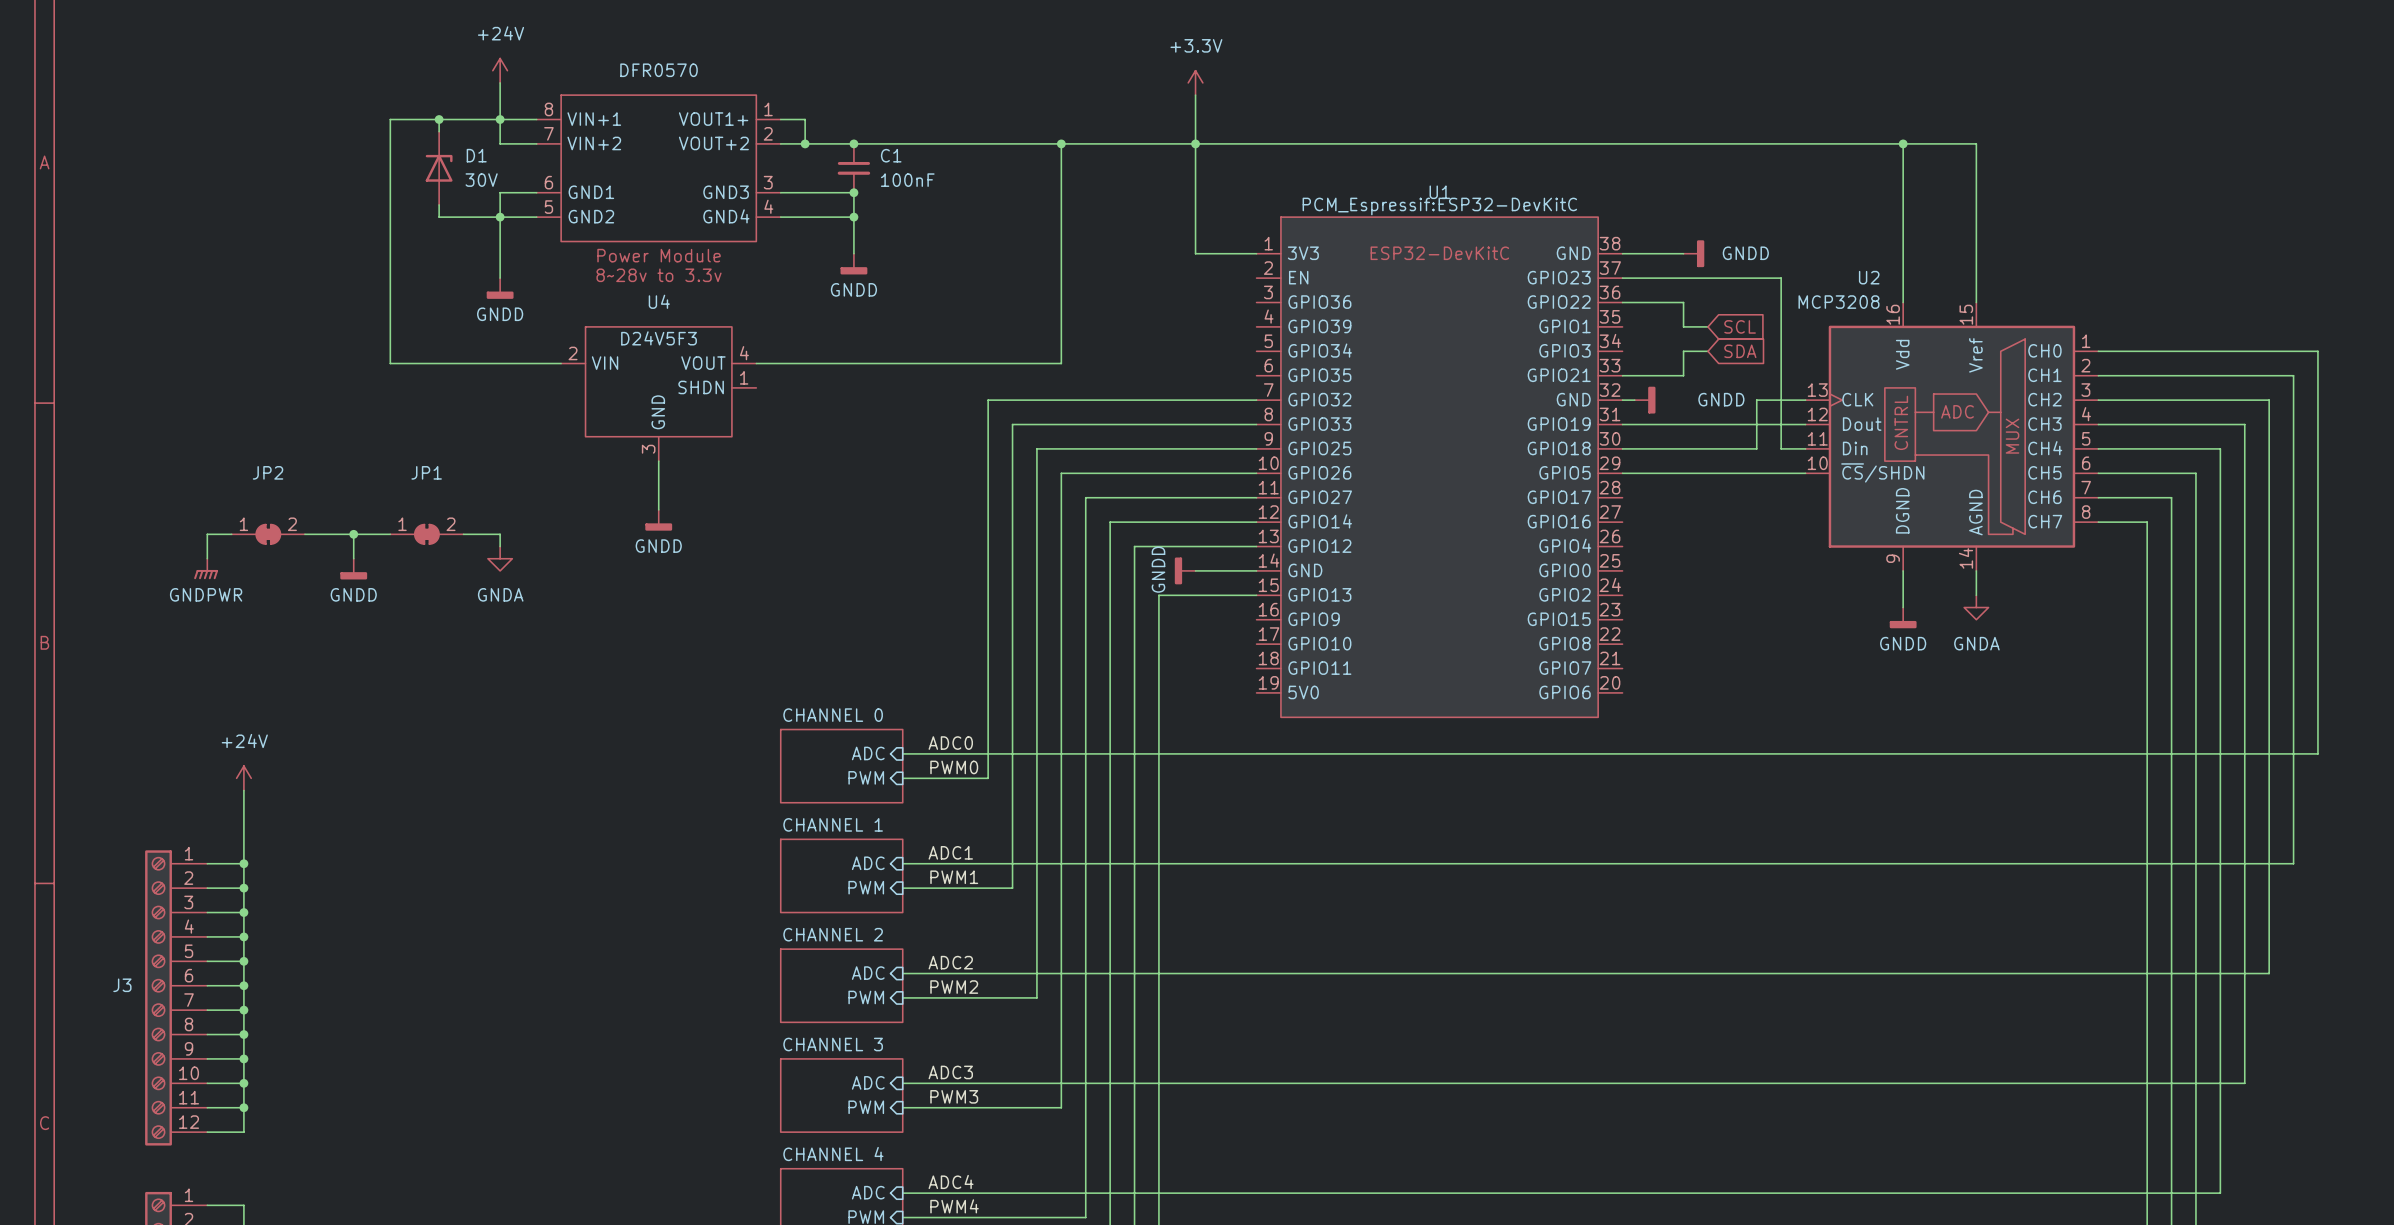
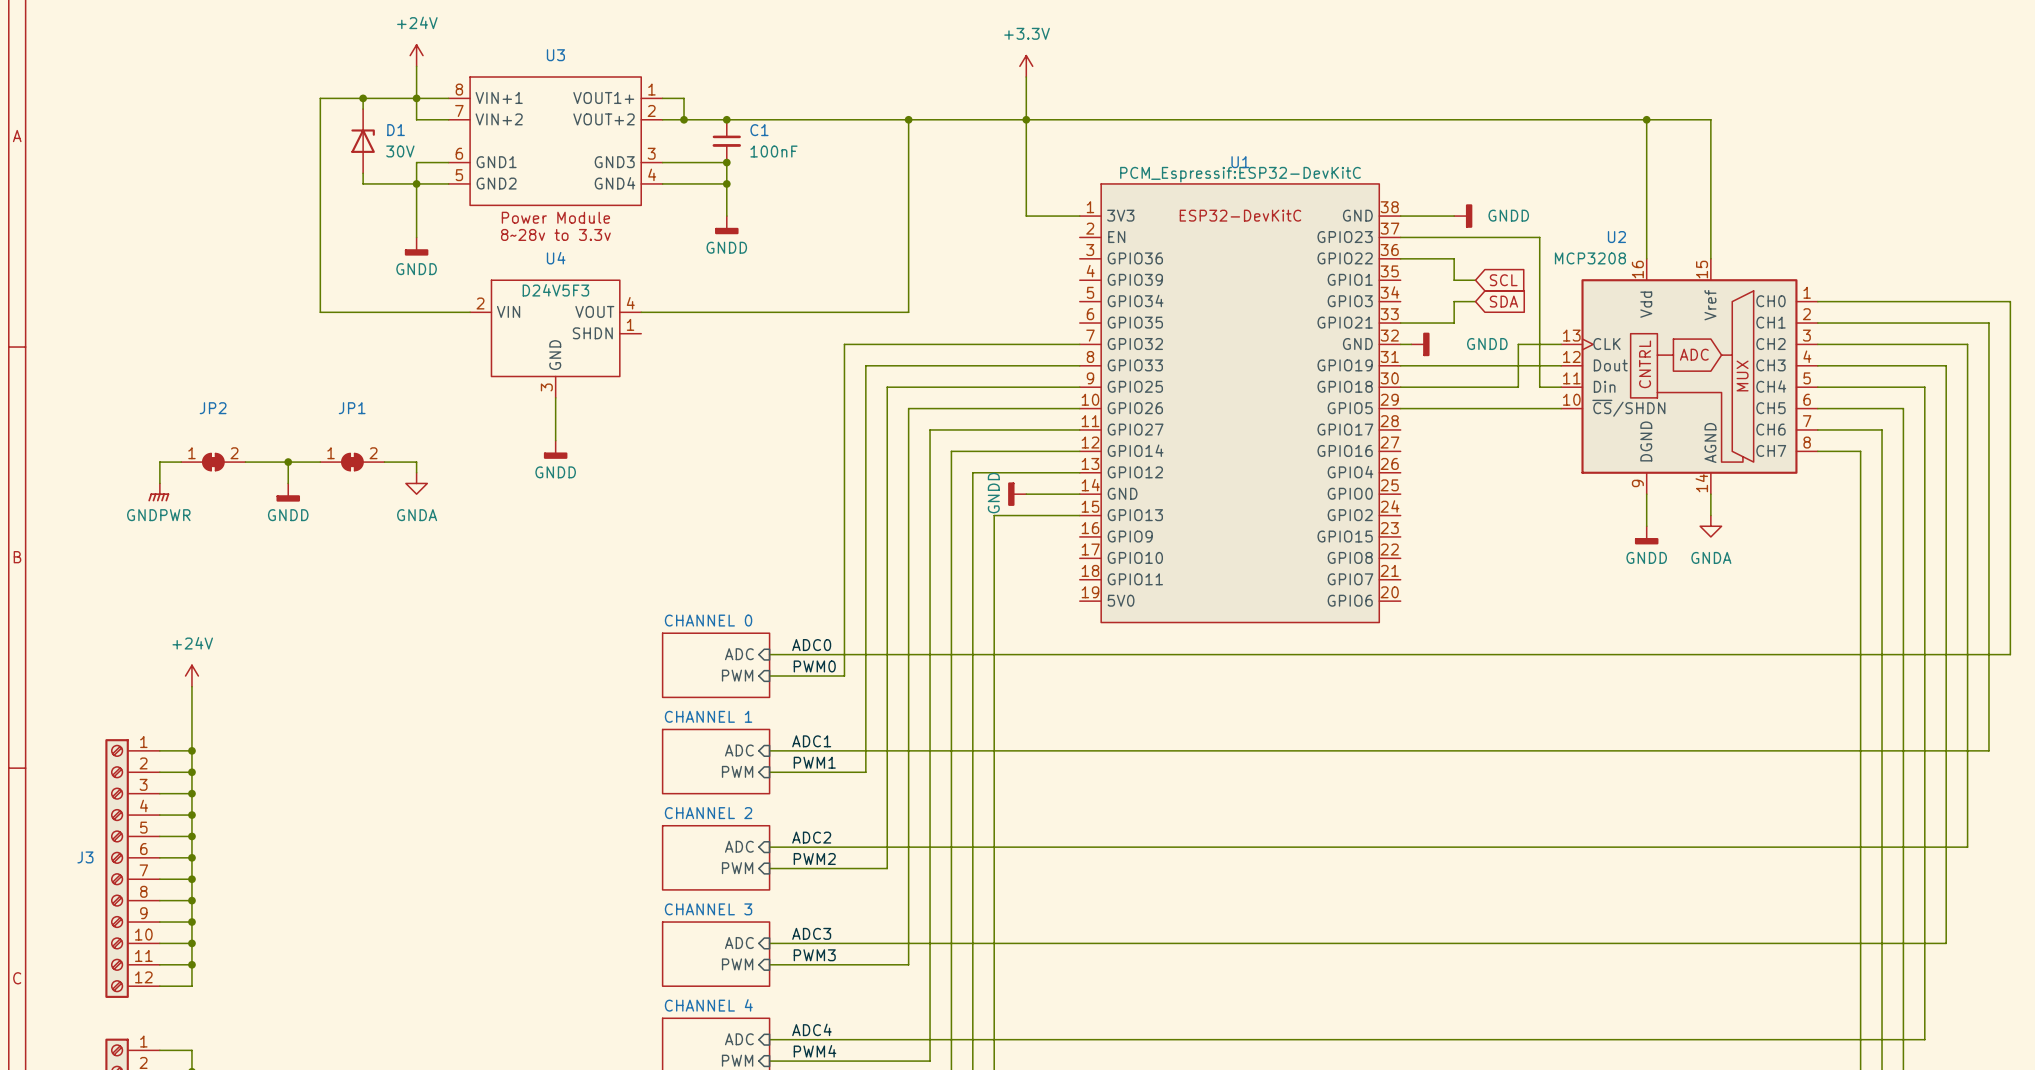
DFR0570 name: DFR0570 (659, 70) -> U3 (555, 55)

